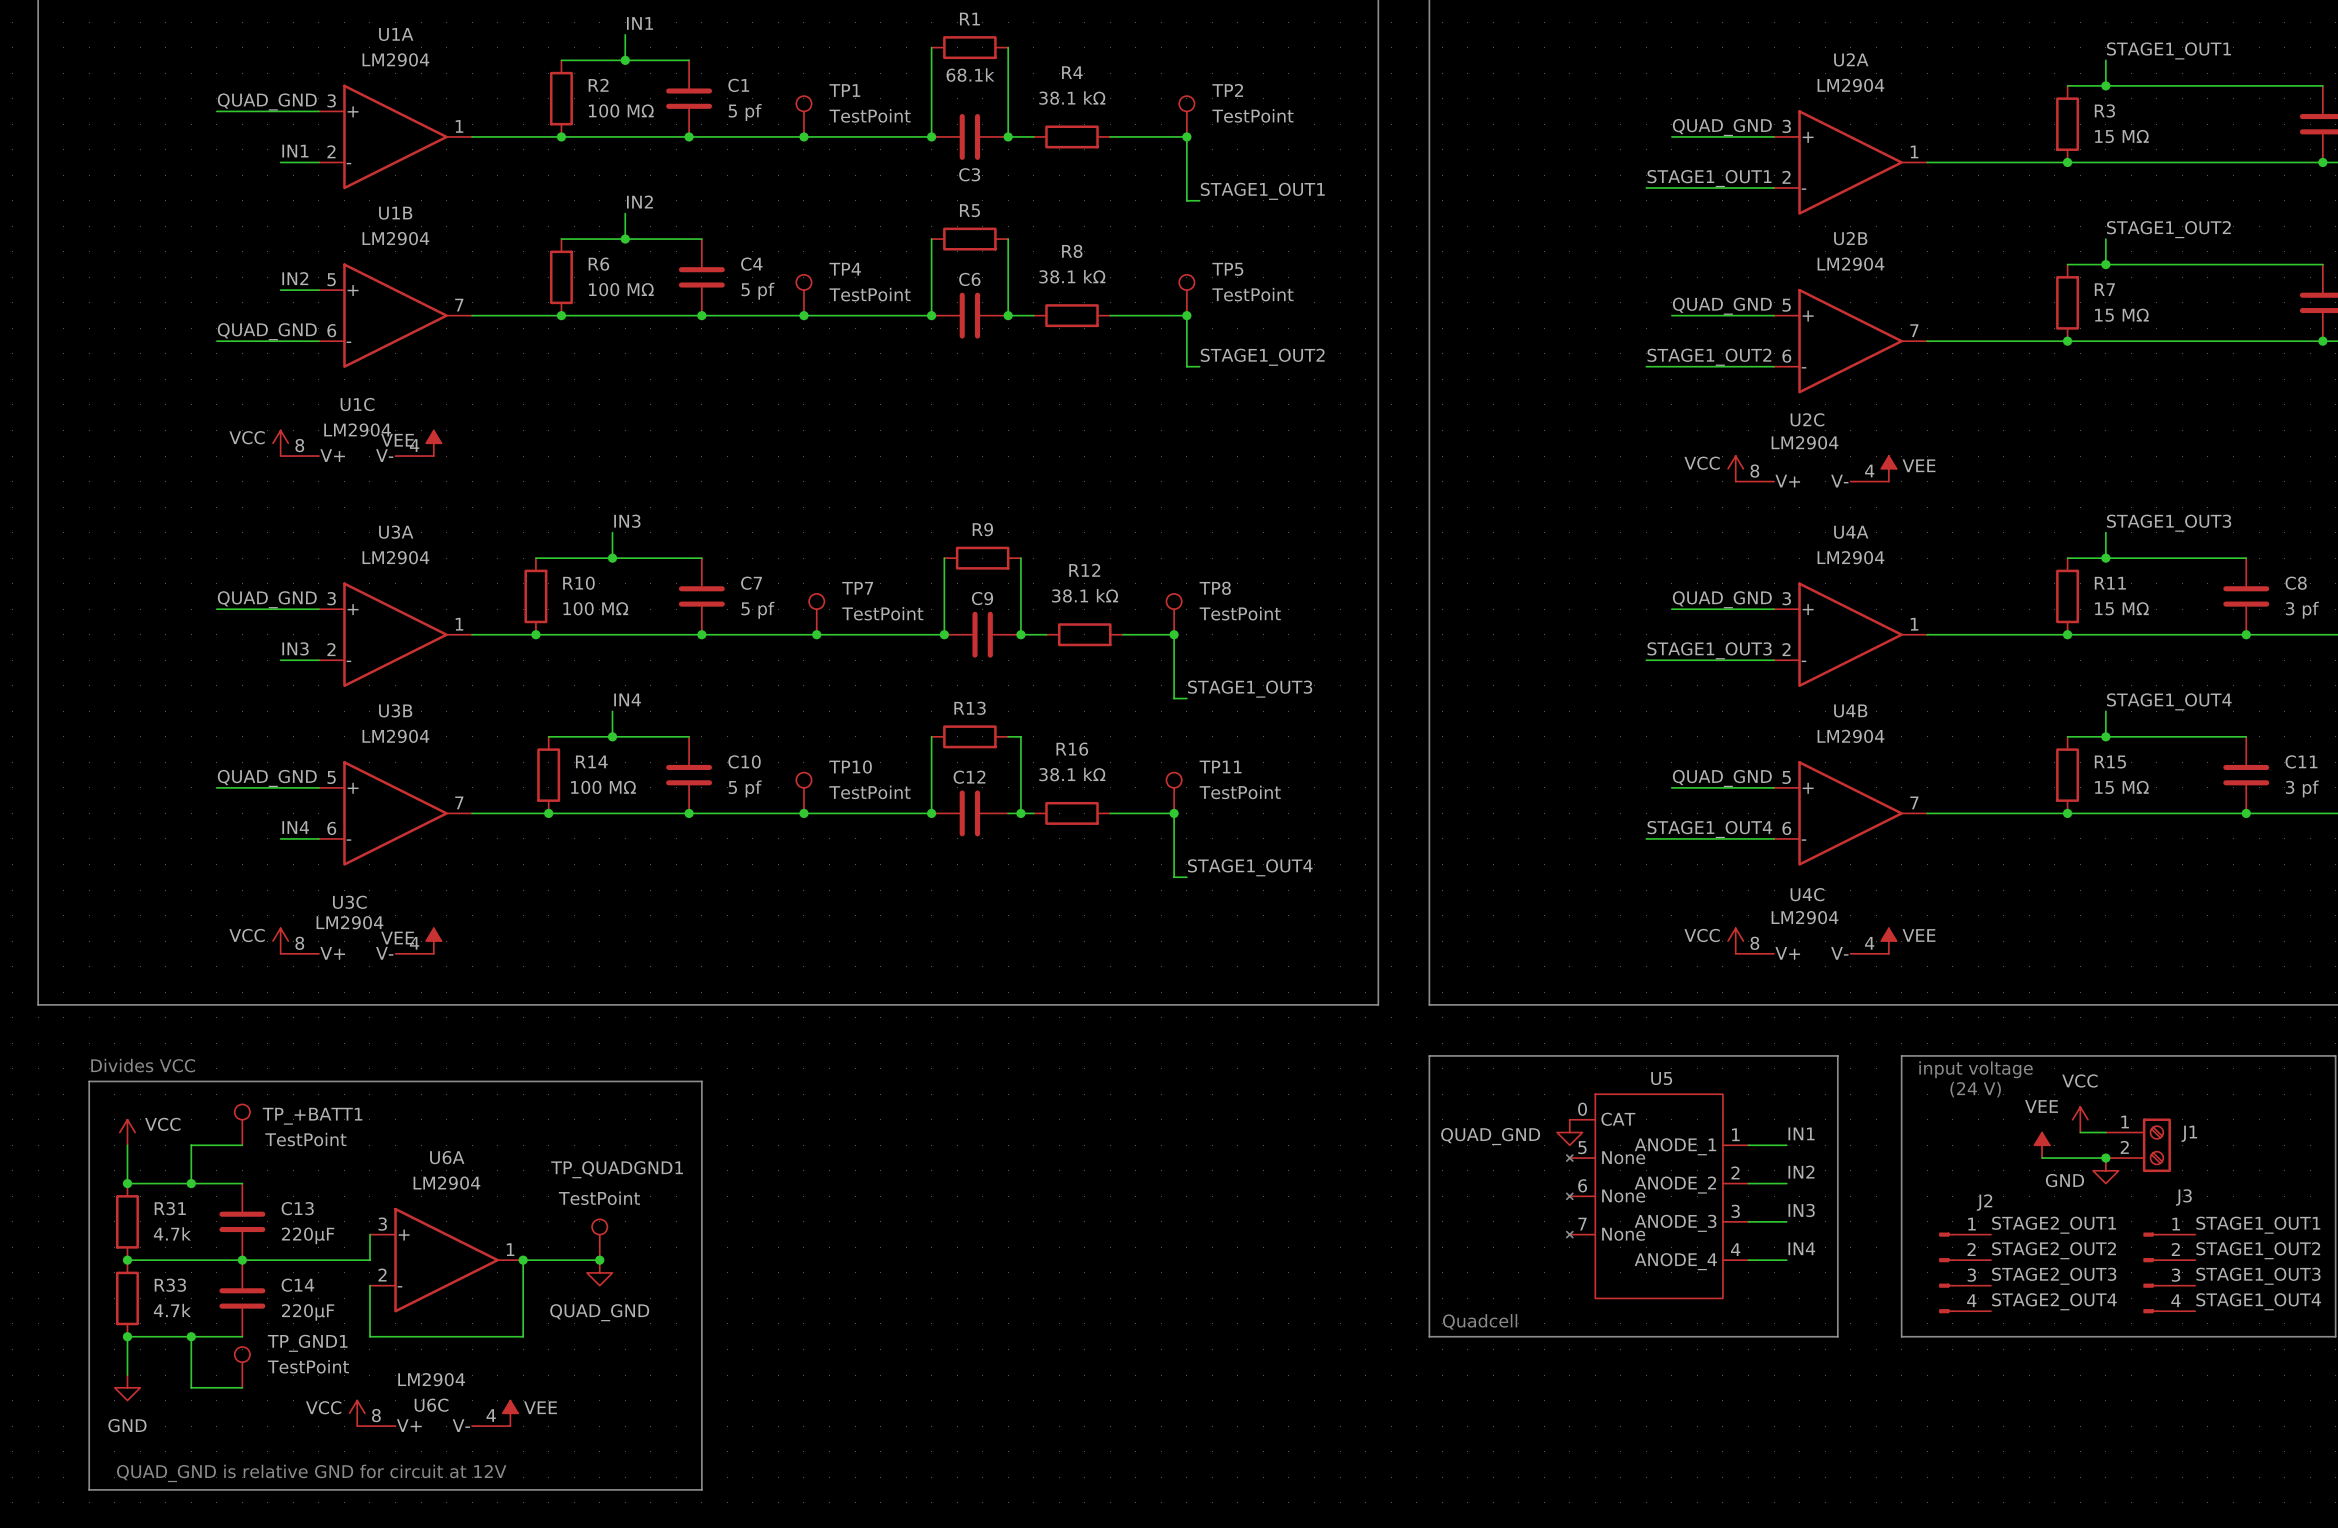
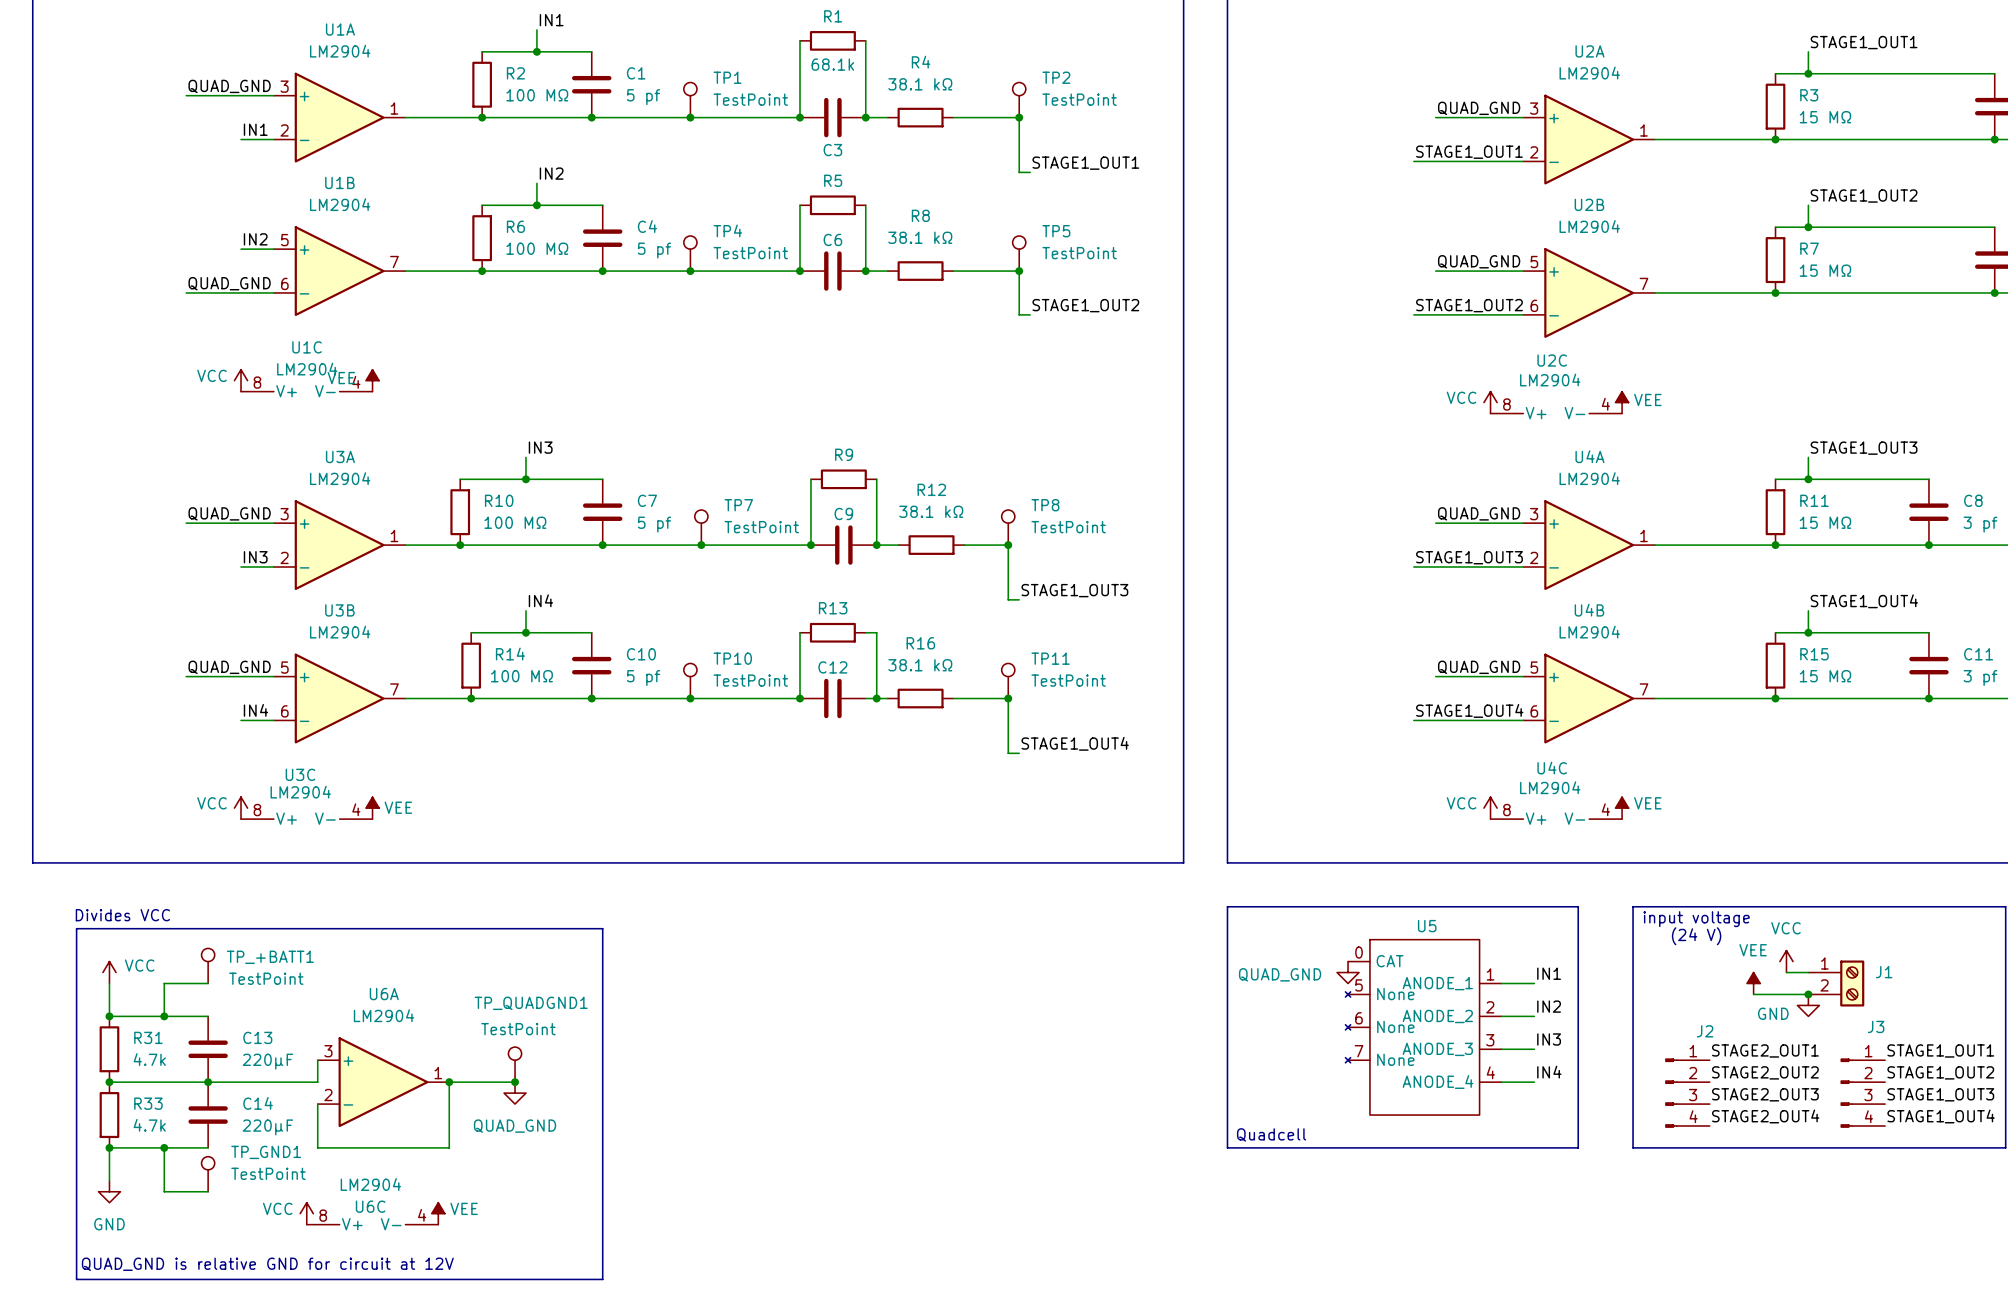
power symbol text position: VEE (397, 938) -> VEE (398, 807)

